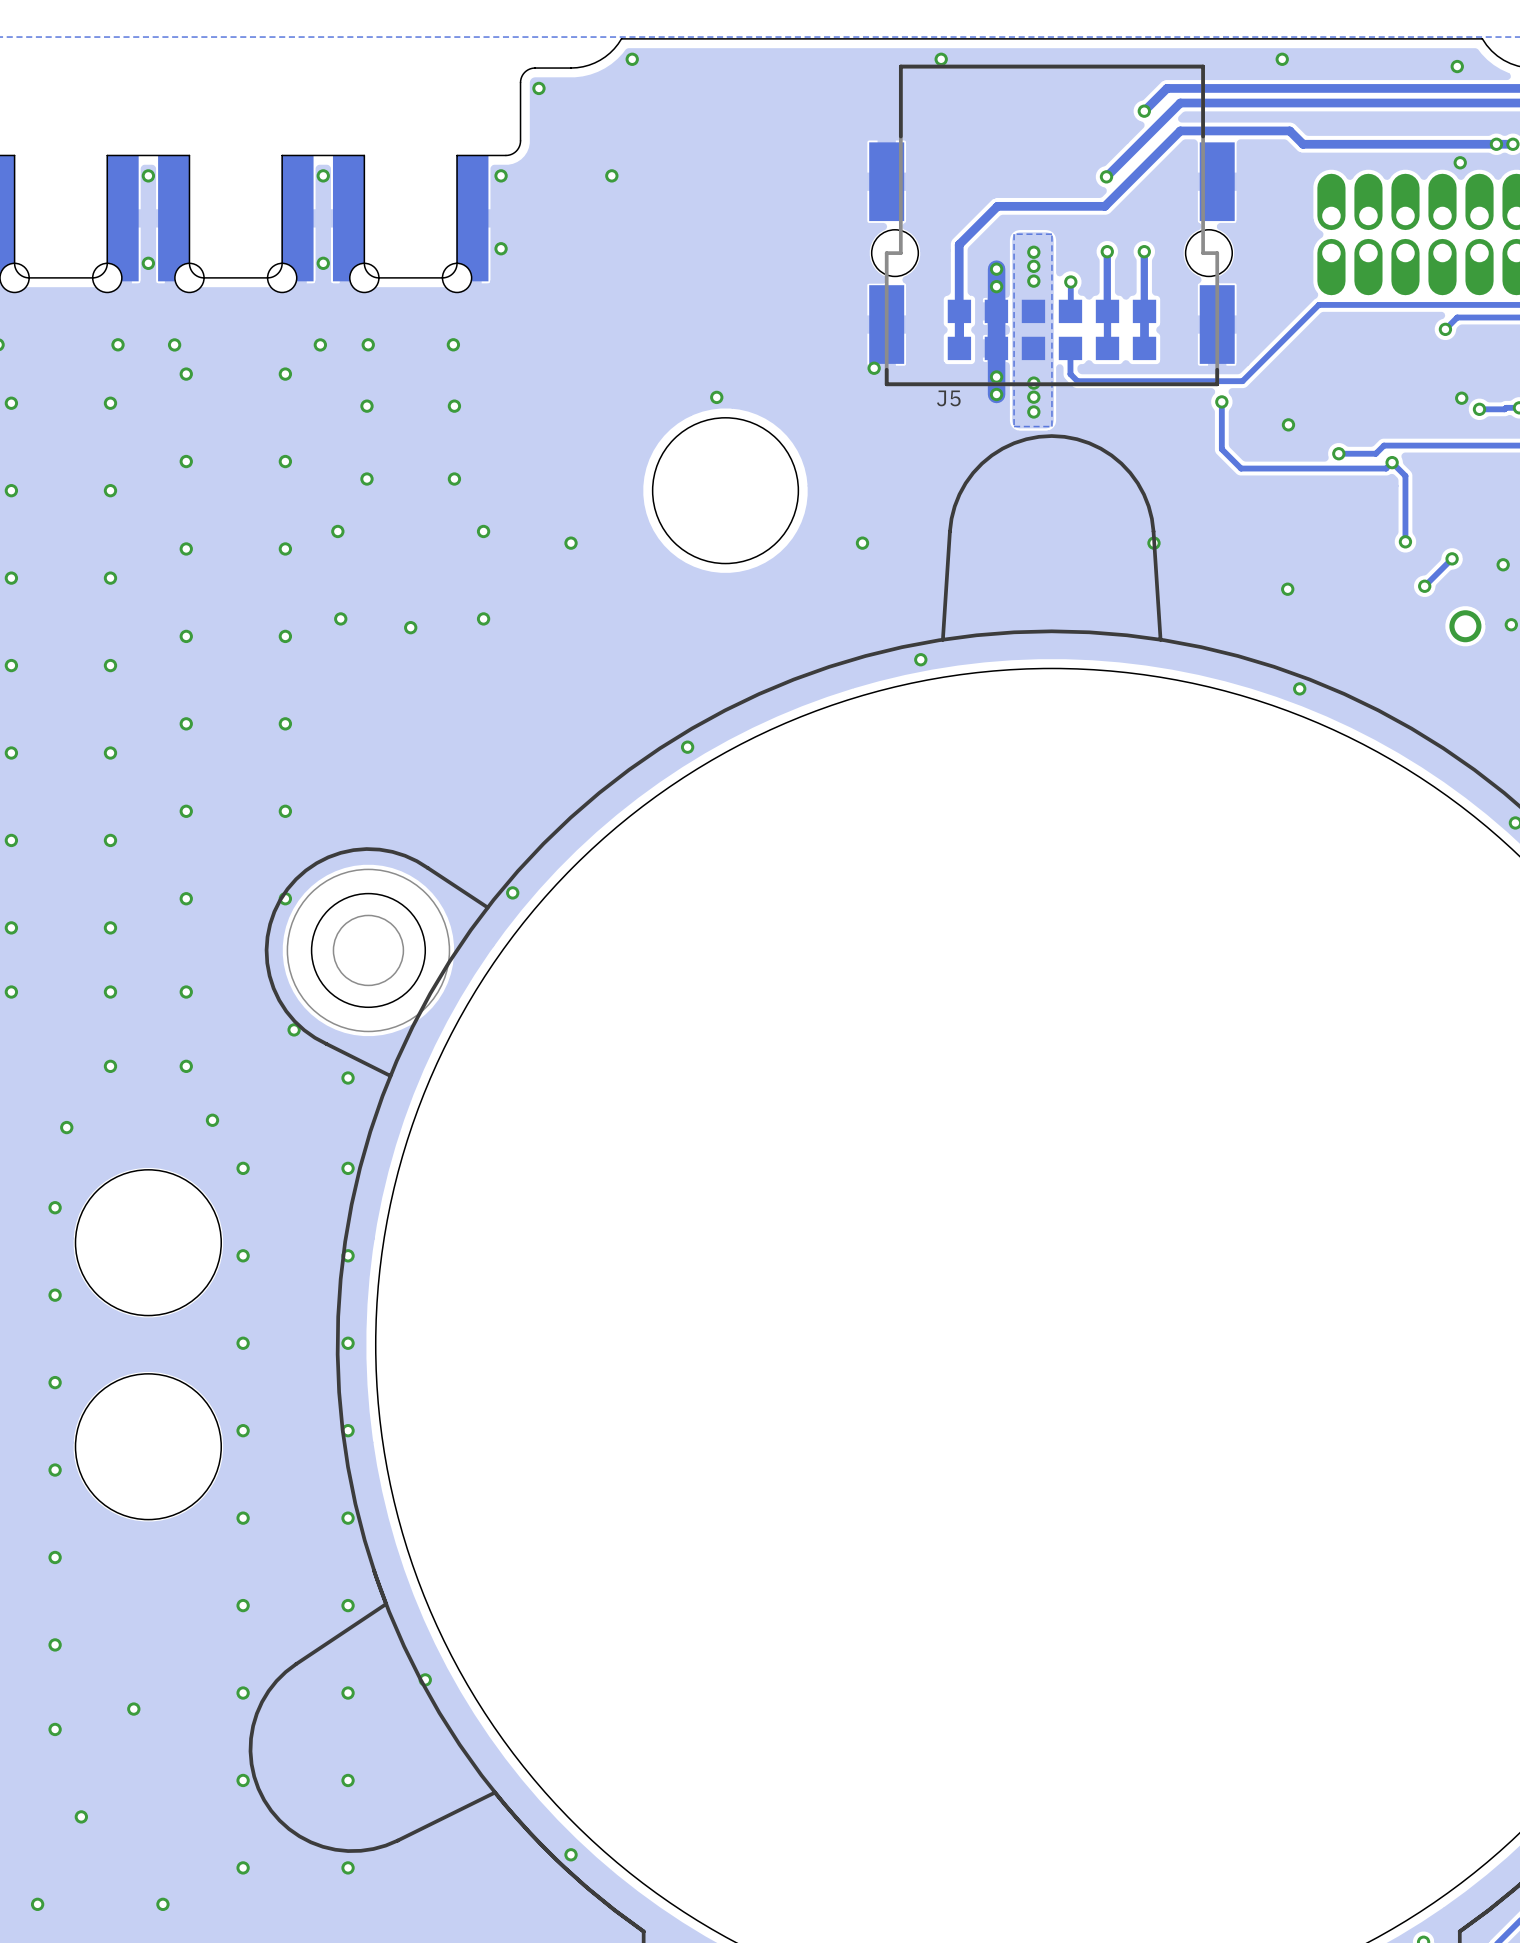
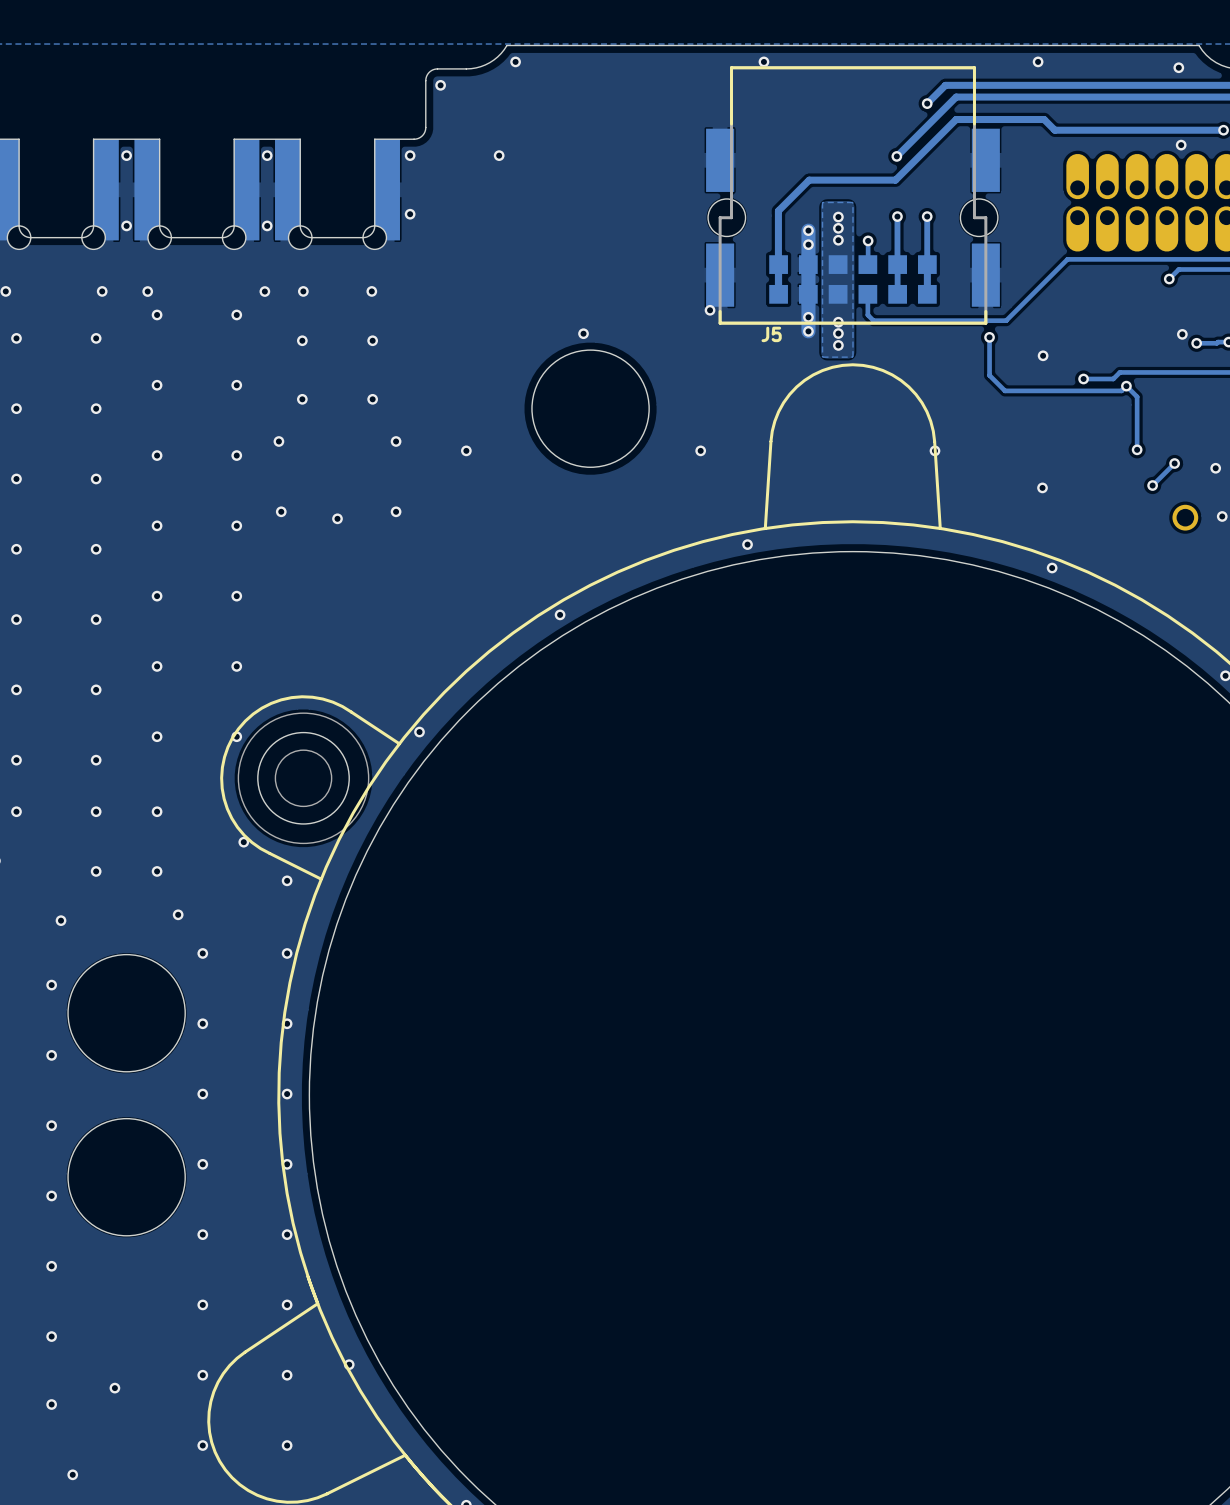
via: (1496, 144) -> none

